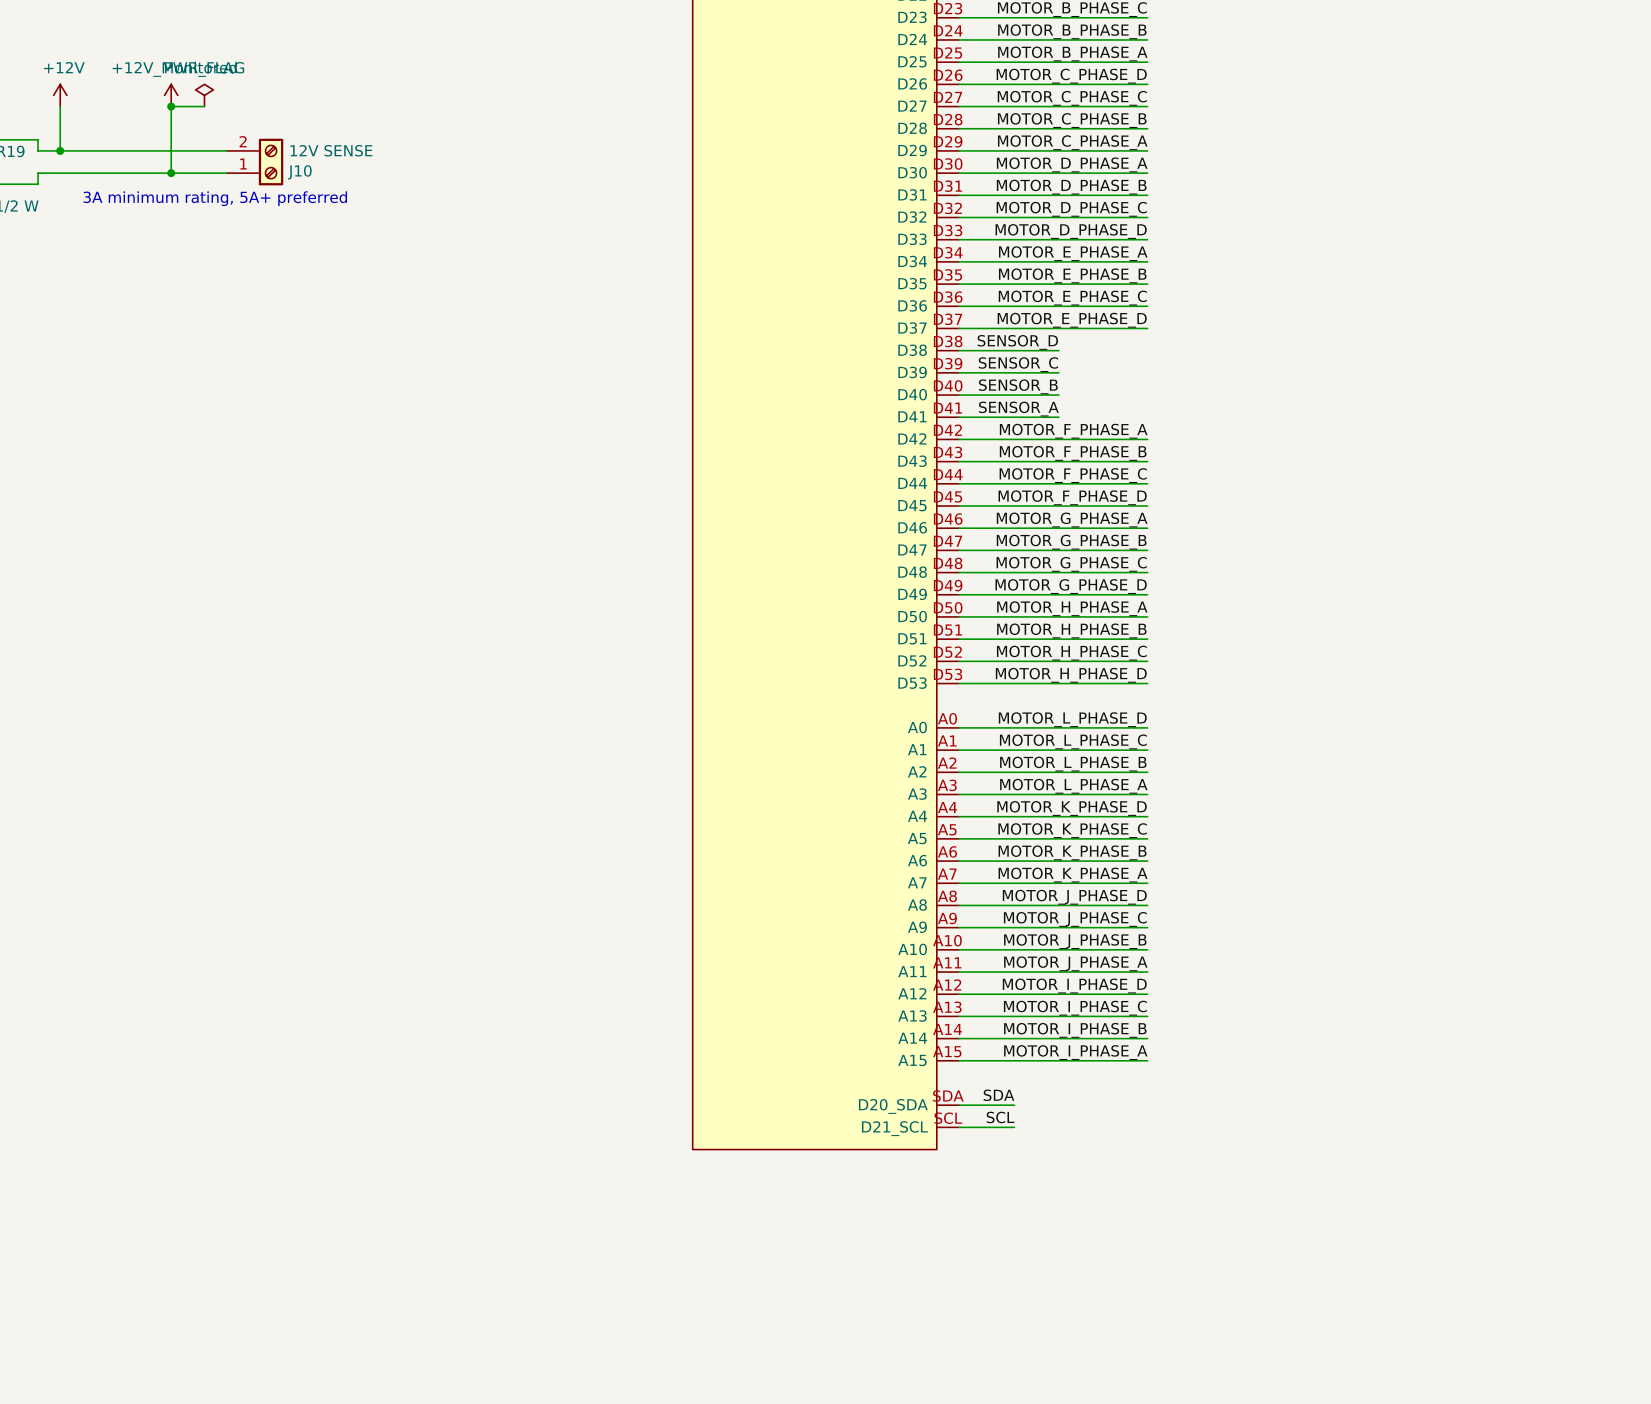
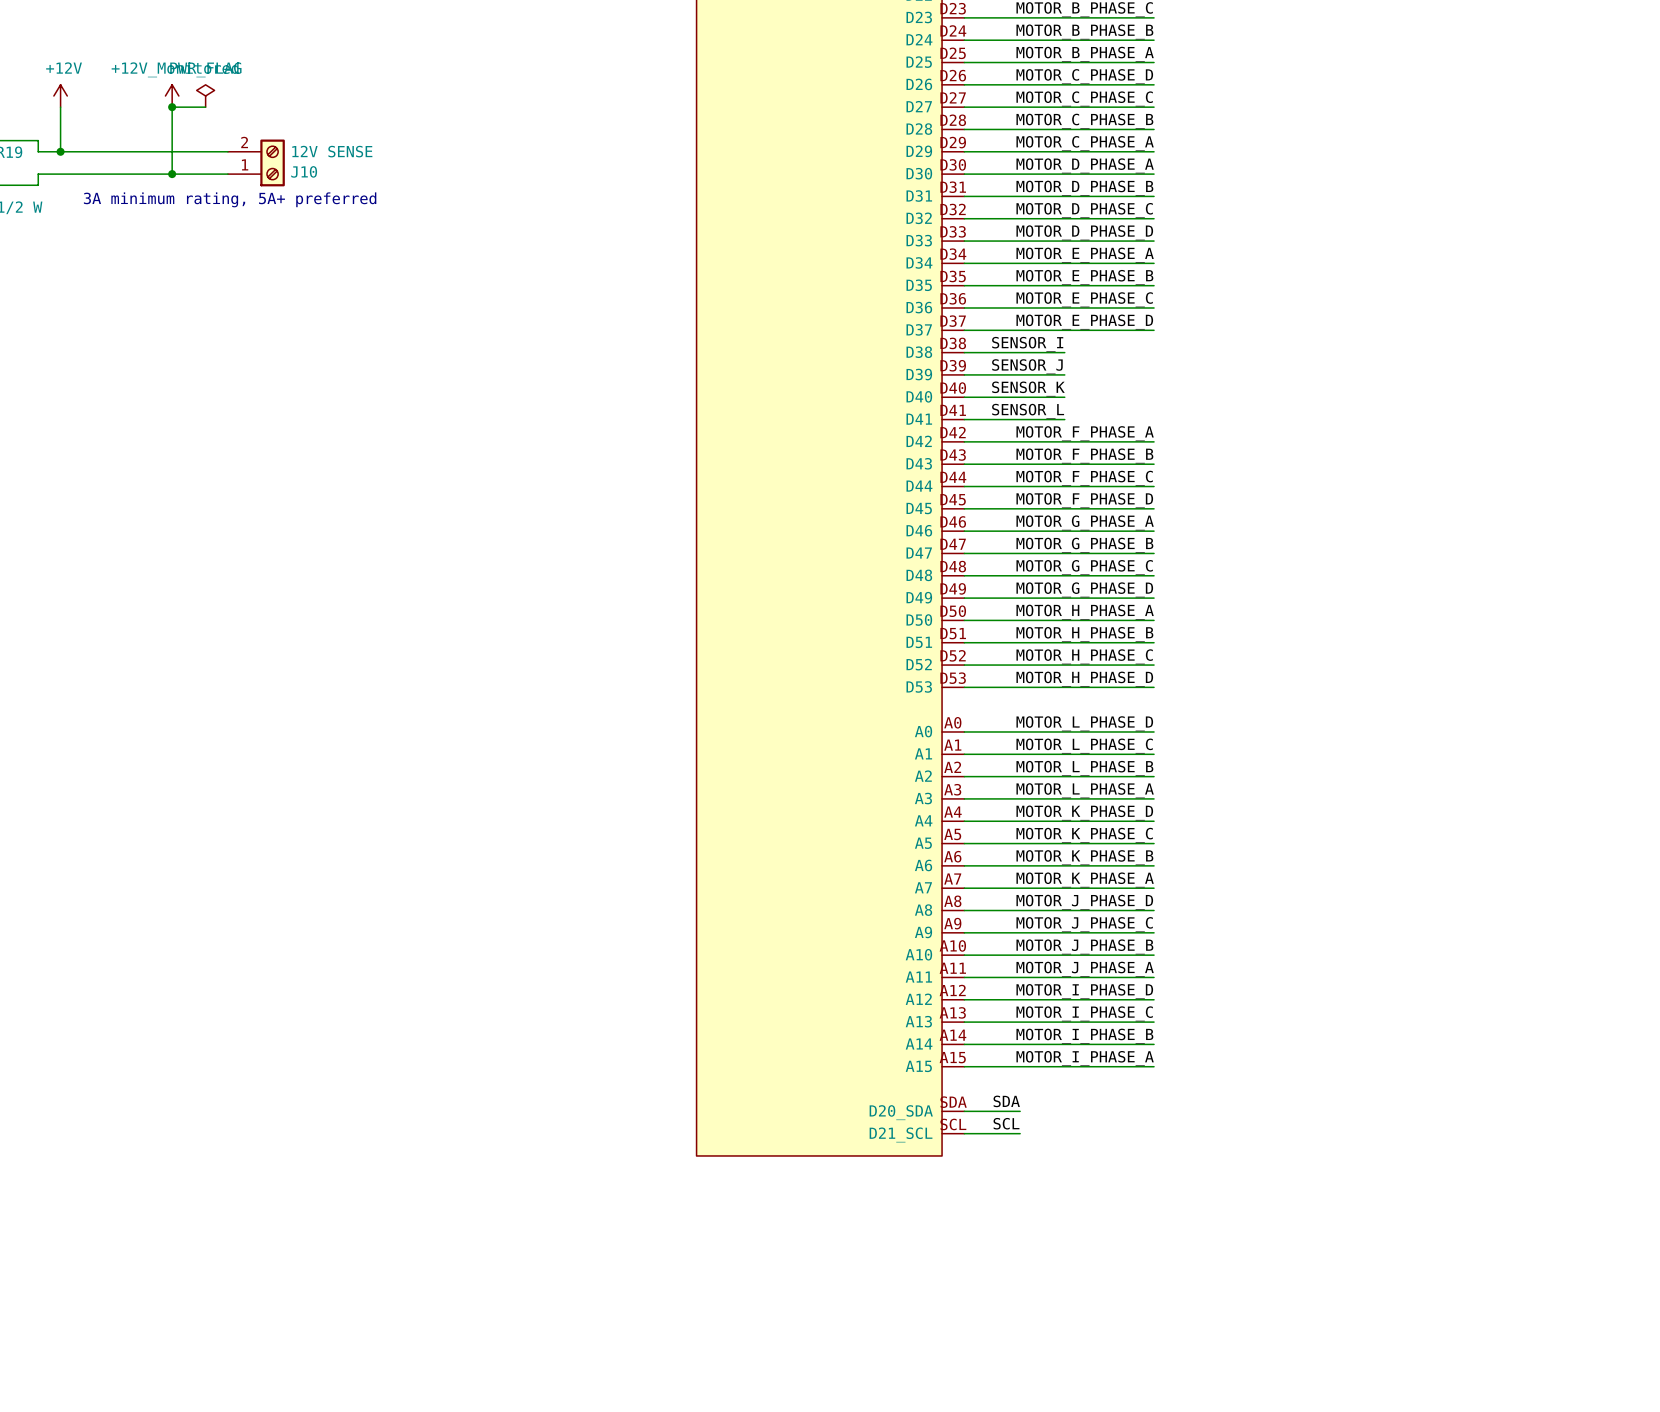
label: SENSOR_D (1017, 342) -> SENSOR_I (1027, 344)
label: SENSOR_C (1018, 364) -> SENSOR_J (1027, 366)
label: SENSOR_B (1018, 386) -> SENSOR_K (1028, 389)
label: SENSOR_A (1018, 409) -> SENSOR_L (1028, 411)

